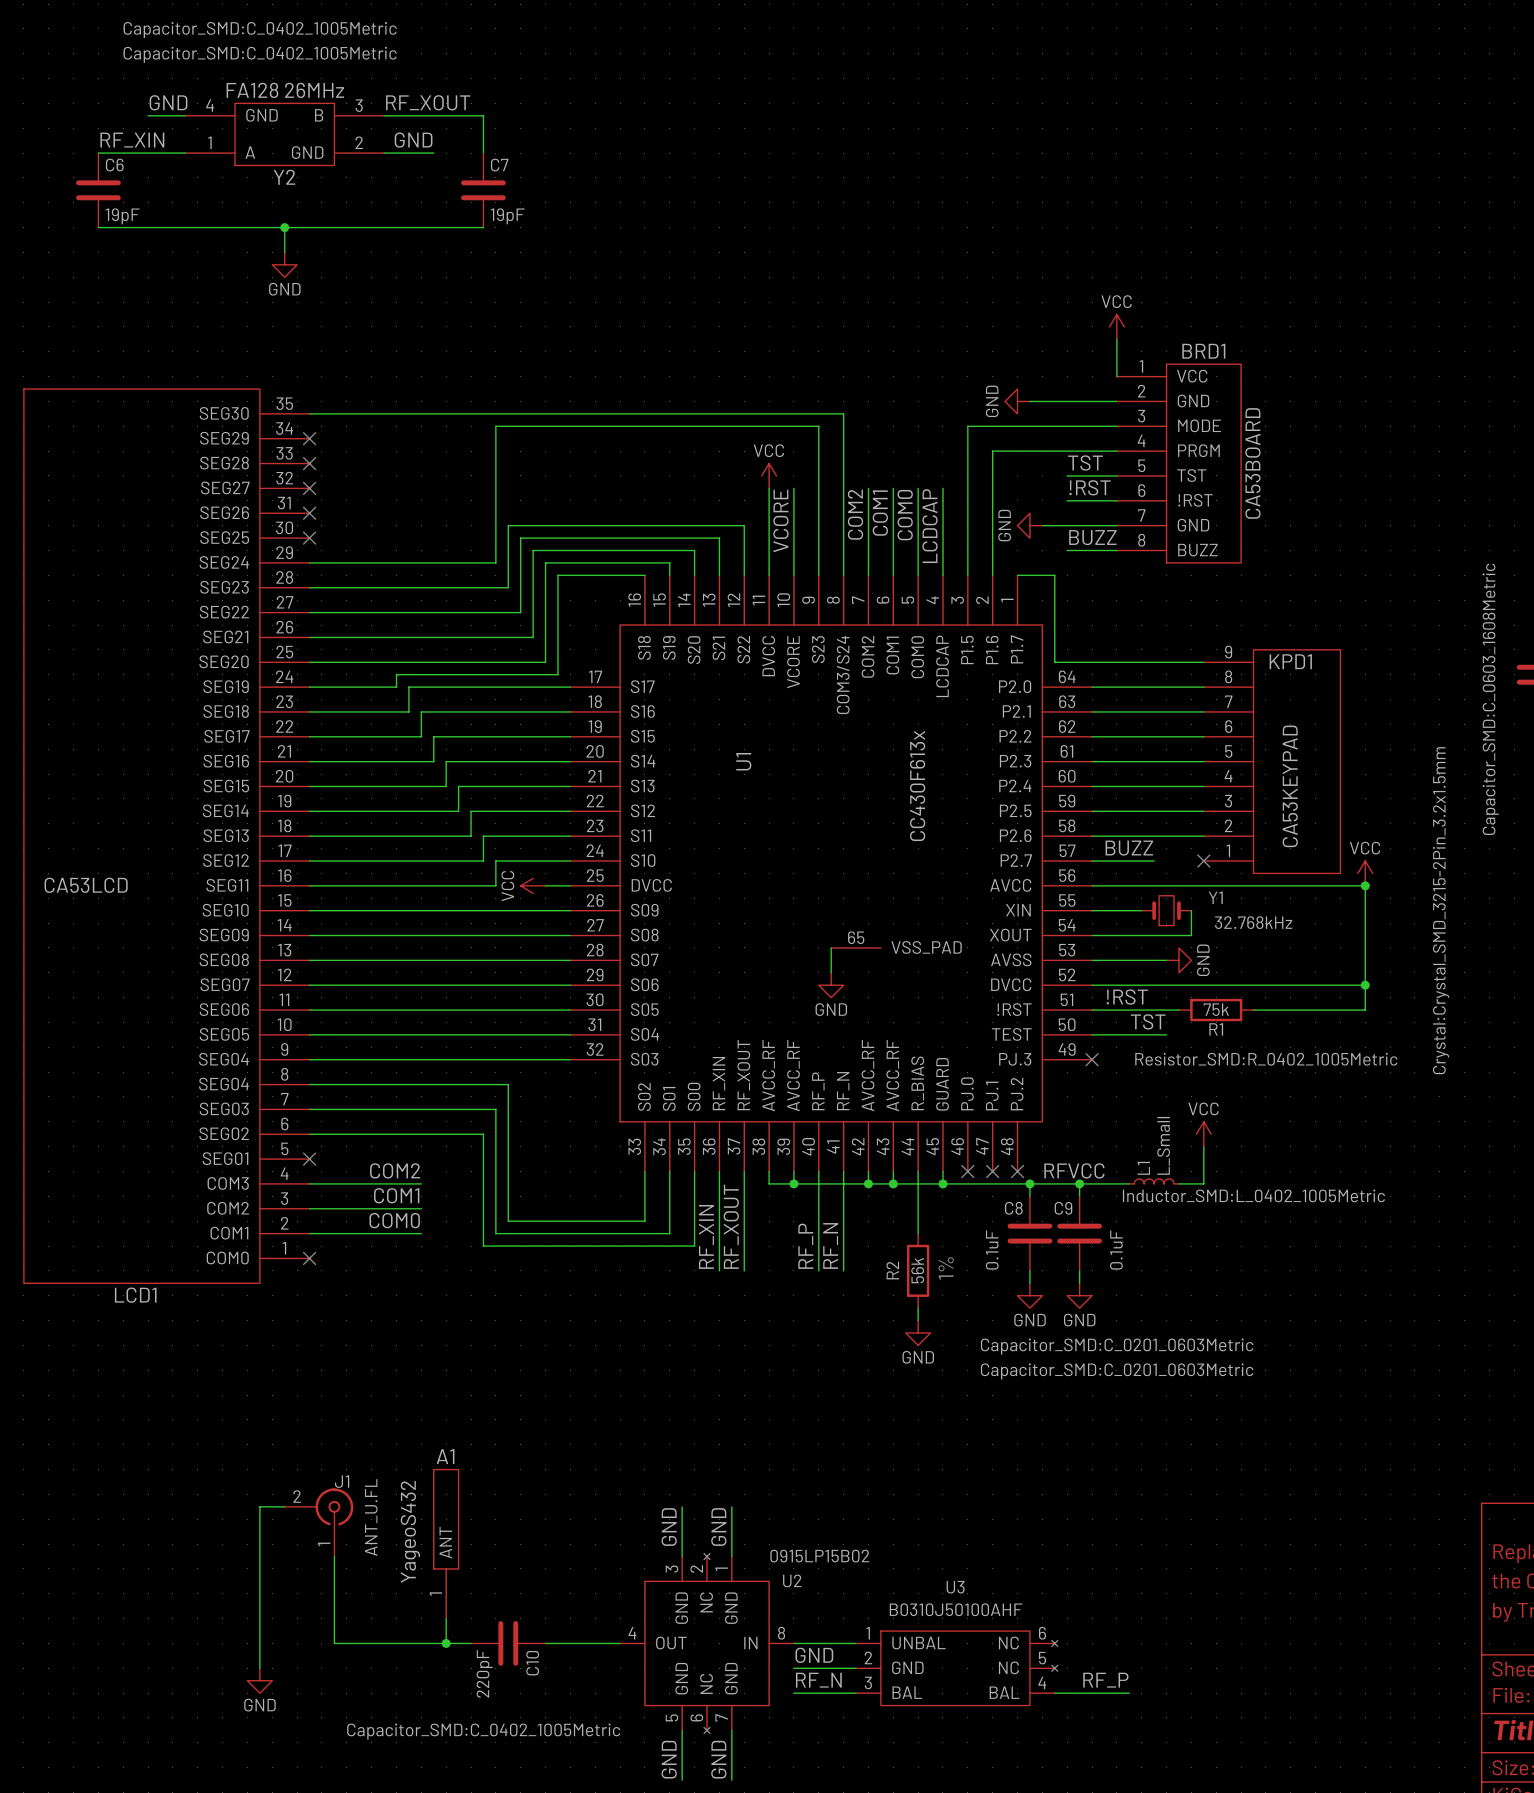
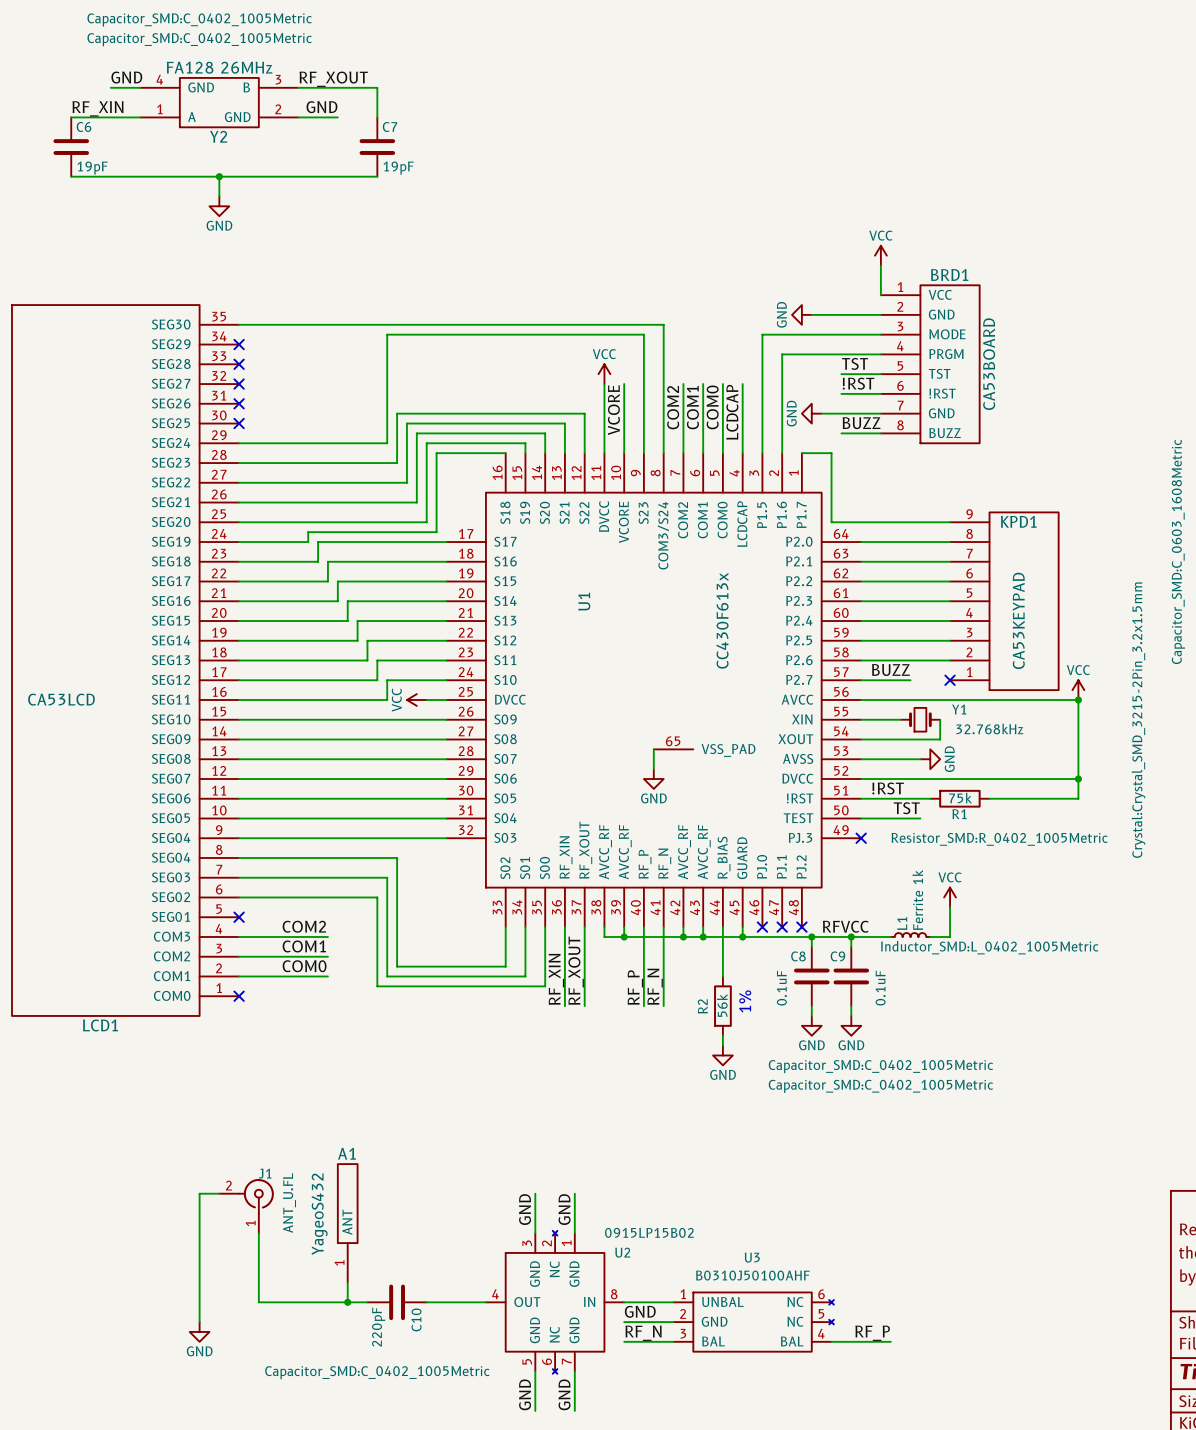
L1 value: L_Small (1163, 1145) -> Ferrite 1k (917, 900)
C9 text: Capacitor_SMD:C_0201_0603Metric (1117, 1346) -> Capacitor_SMD:C_0402_1005Metric (880, 1066)
C8 text: Capacitor_SMD:C_0201_0603Metric (1117, 1371) -> Capacitor_SMD:C_0402_1005Metric (880, 1086)

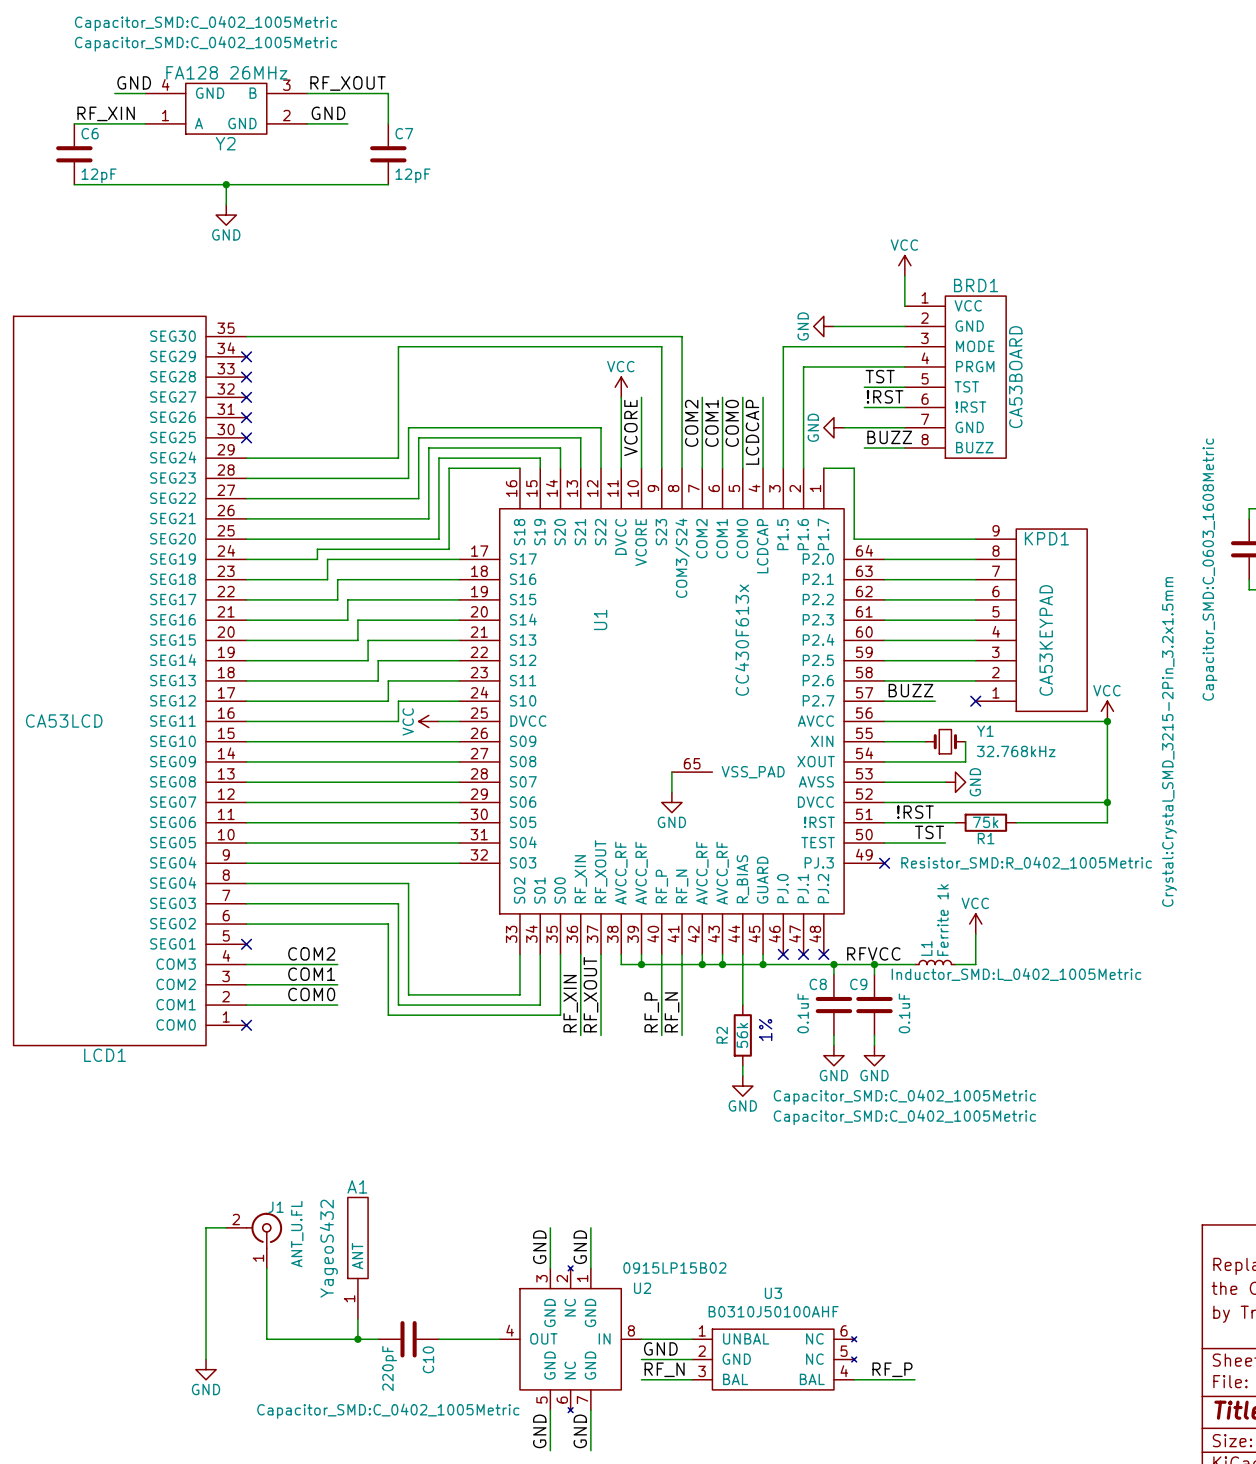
C6 value: 19pF (92, 168) -> 12pF (99, 175)
C7 value: 19pF (398, 168) -> 12pF (412, 175)

